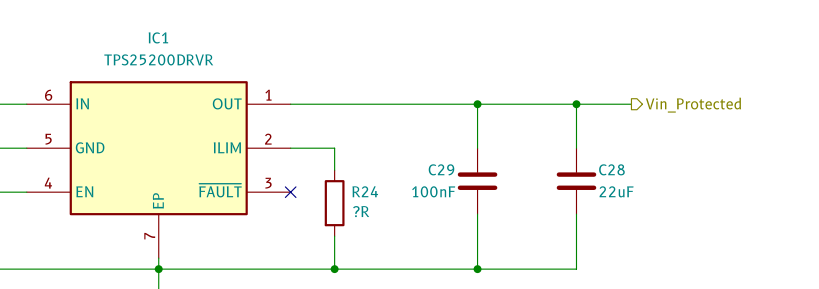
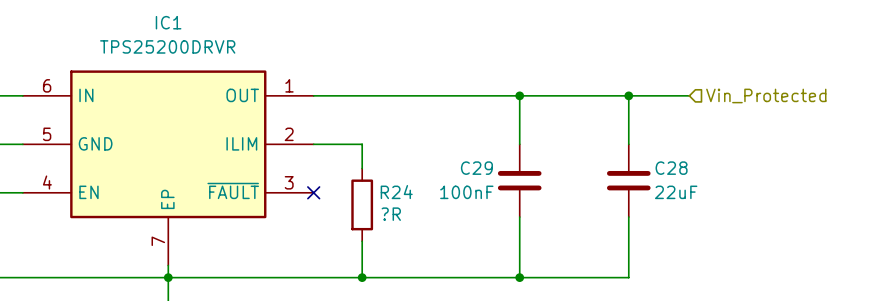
hierarchical label shape: output (693, 105) -> input (766, 95)

